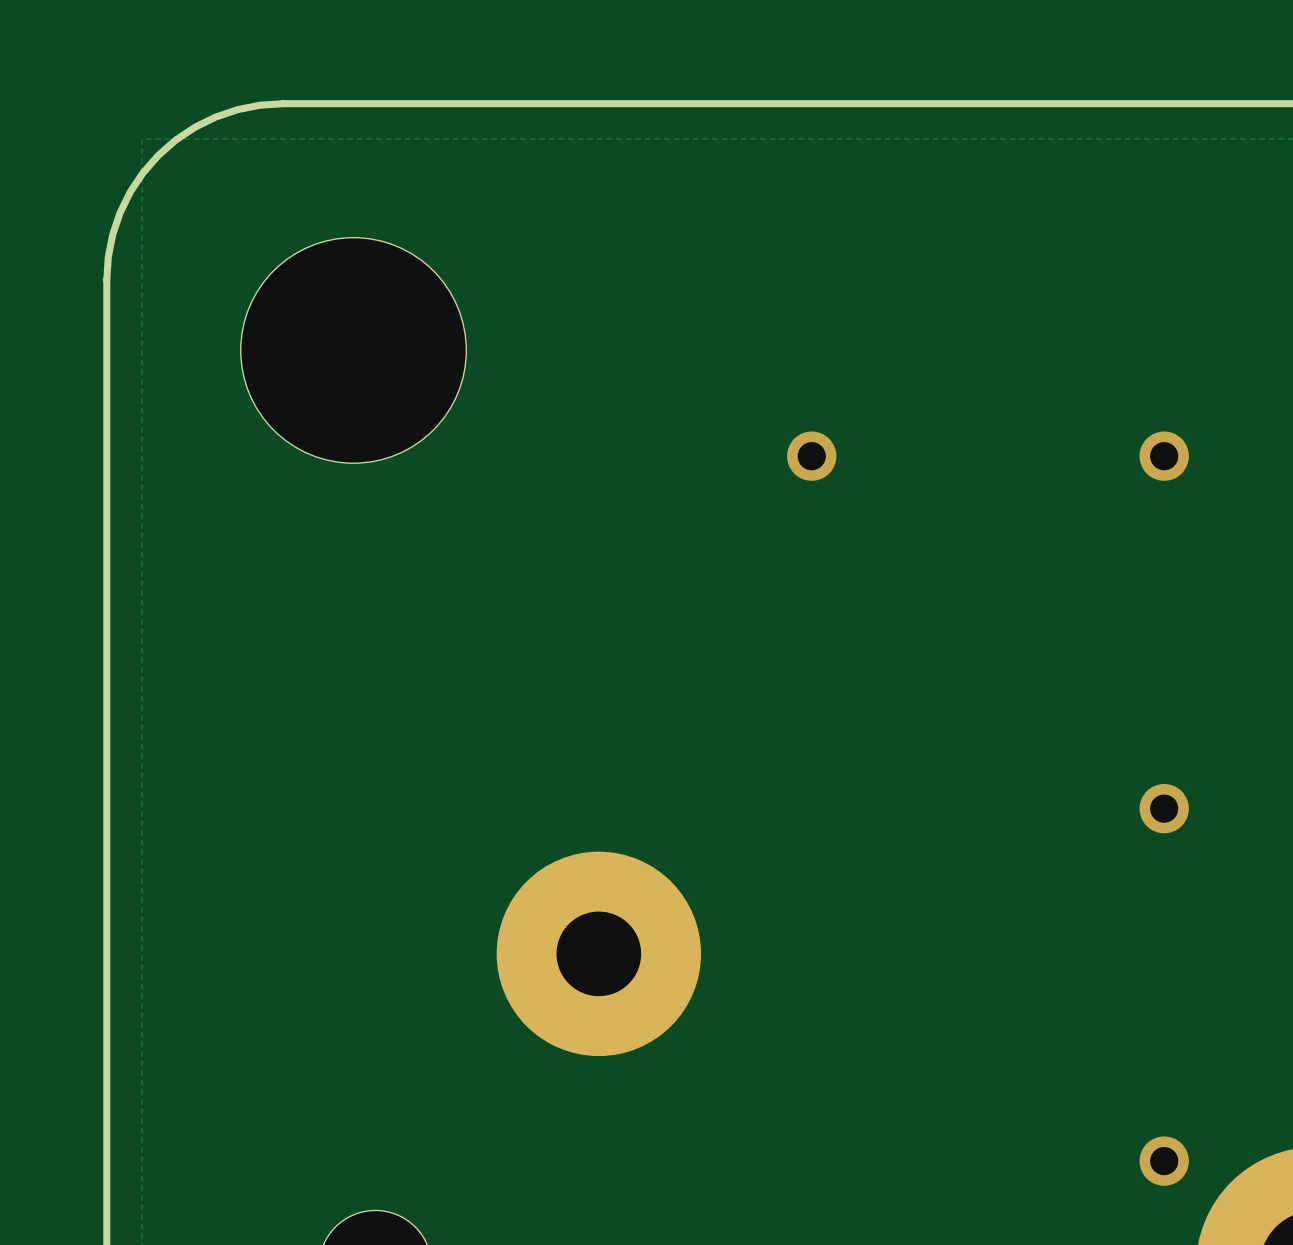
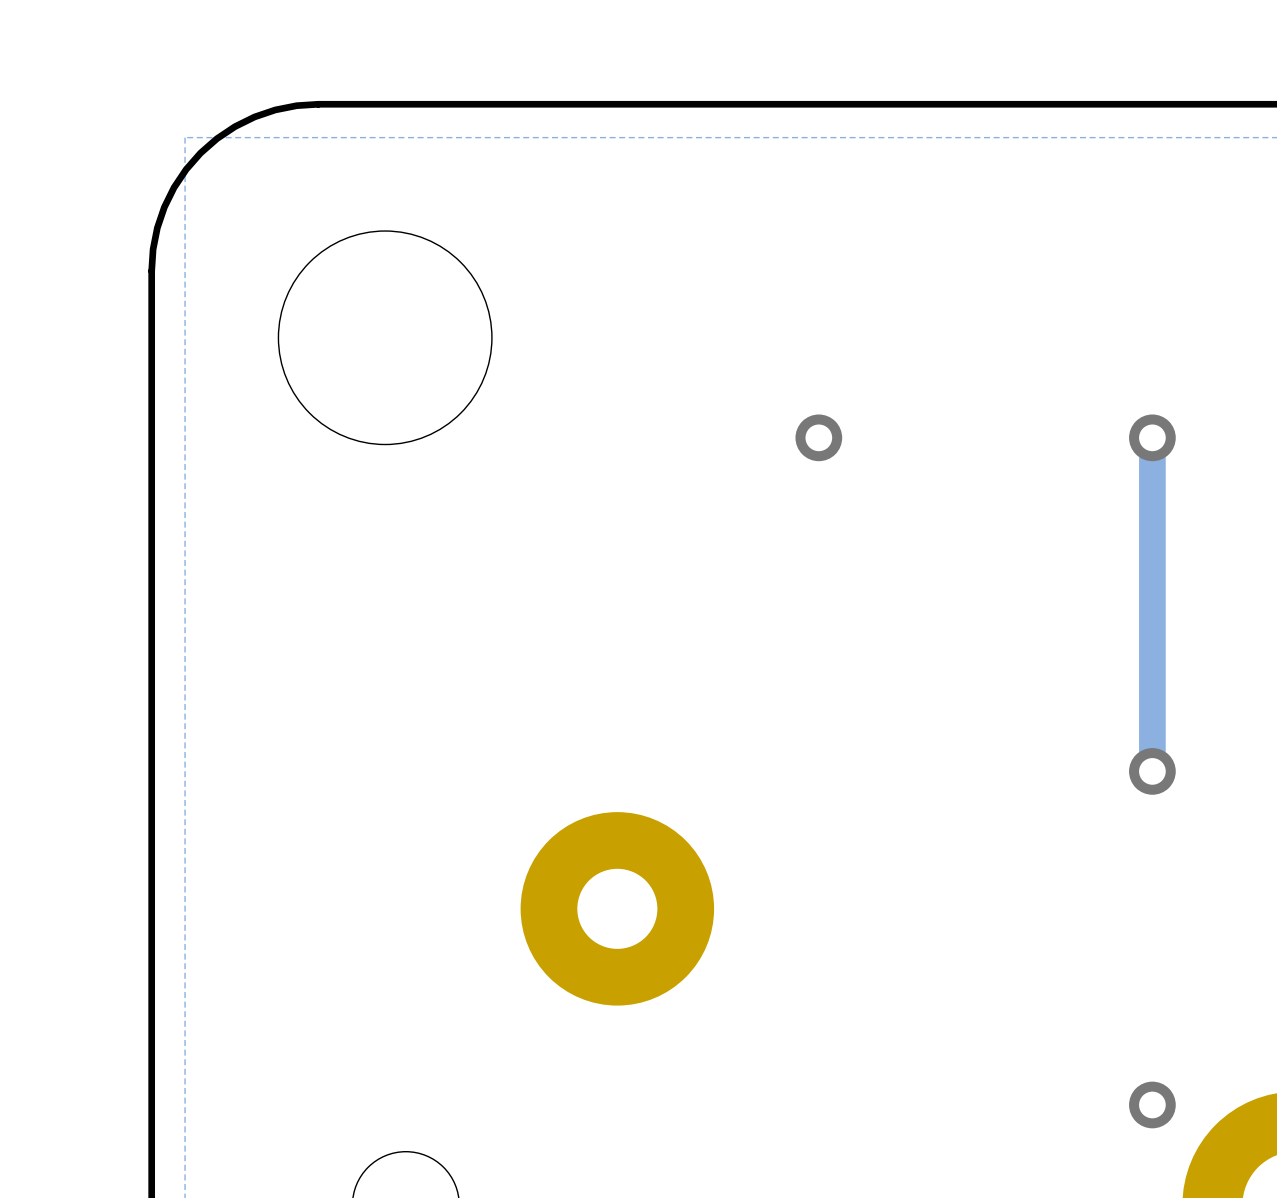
track: none -> (1152, 437) (1152, 771)

